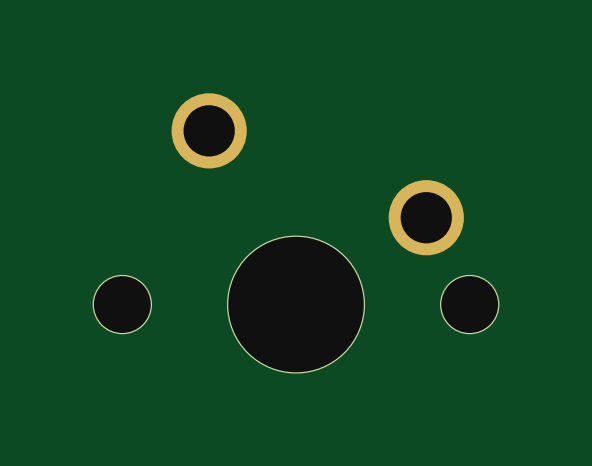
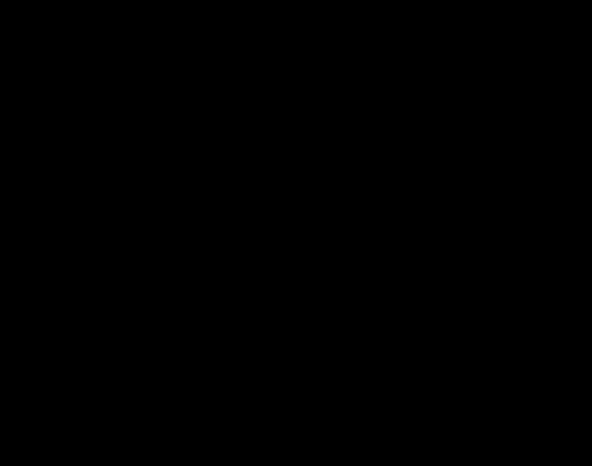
part: (296, 233) -> none

